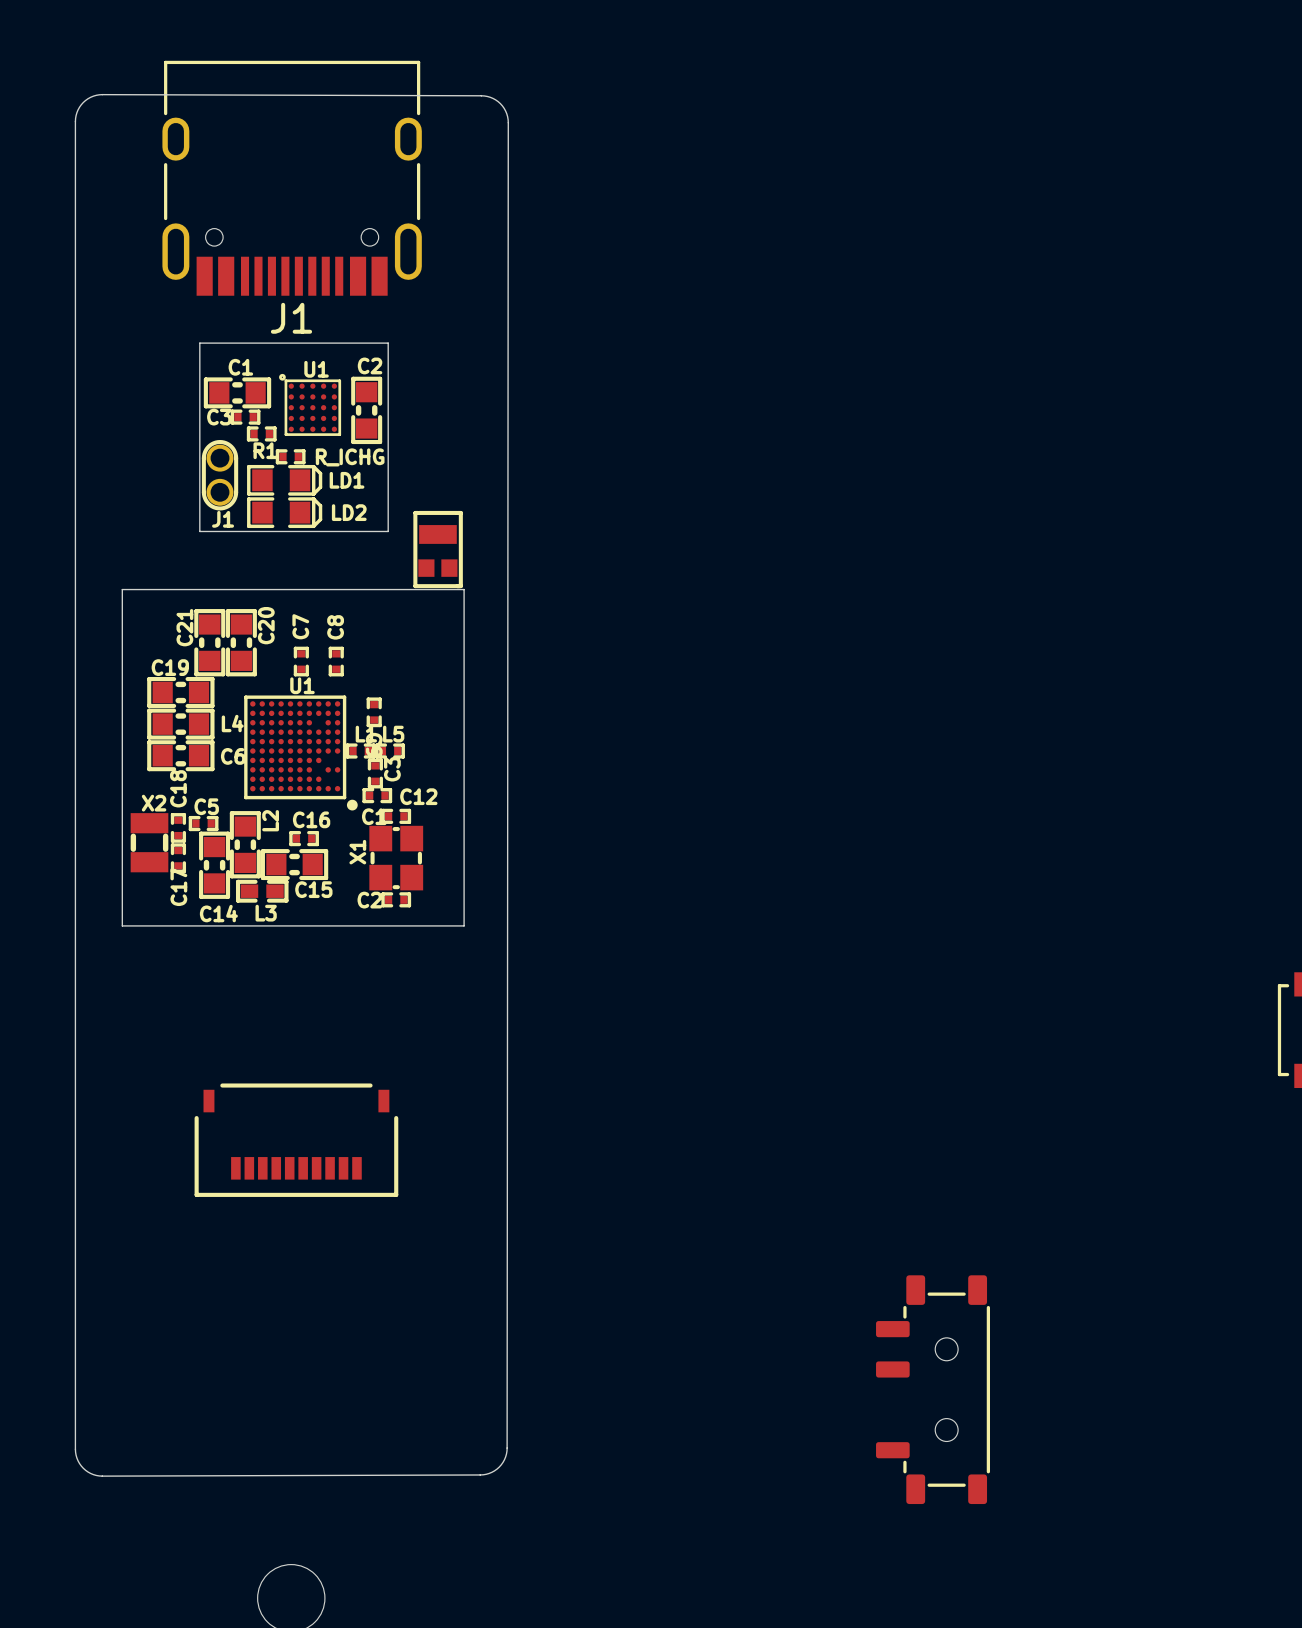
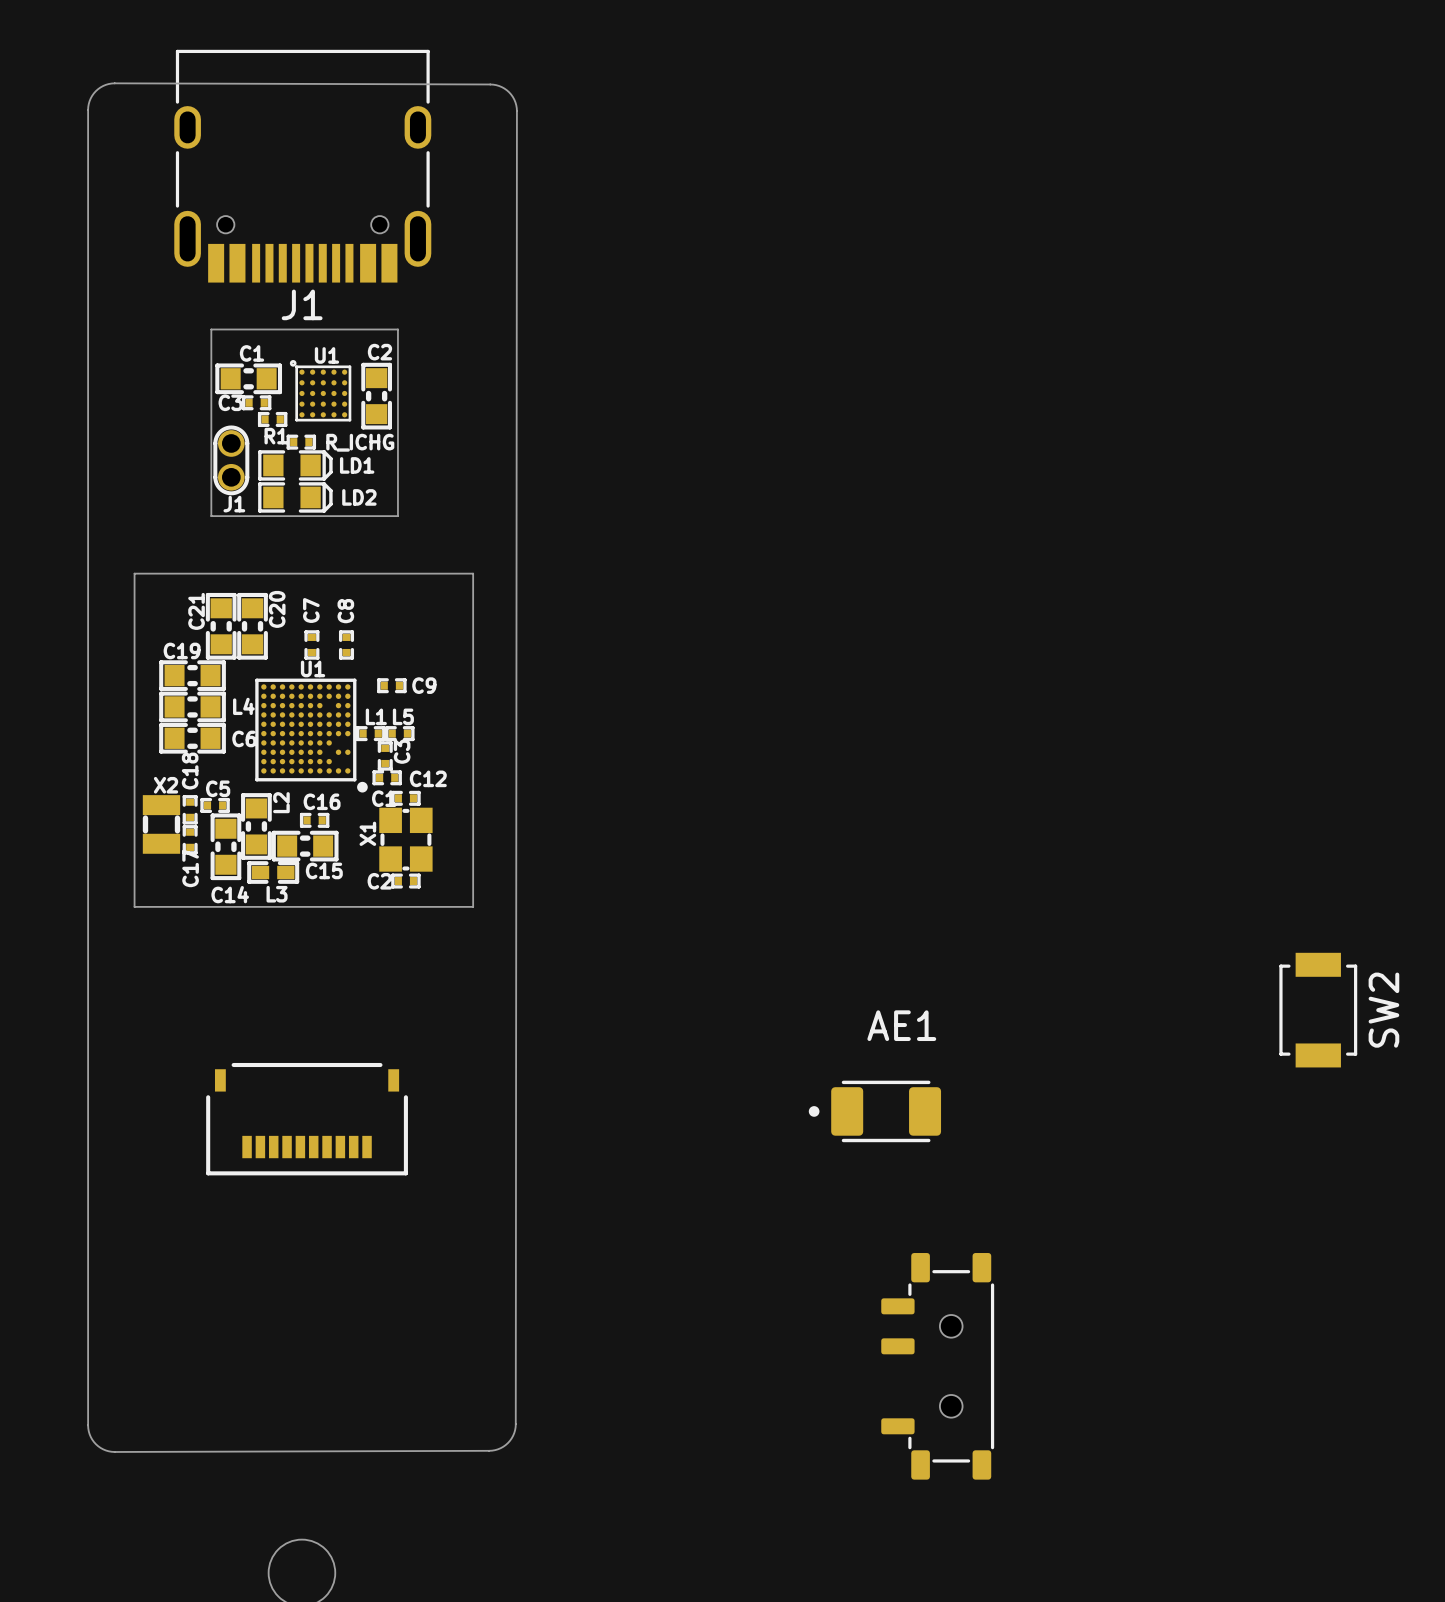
part: (438, 549) -> none
C9 rotation: 0° (374, 712) -> 90° clockwise (391, 685)
AE1: none -> (874, 1111)

